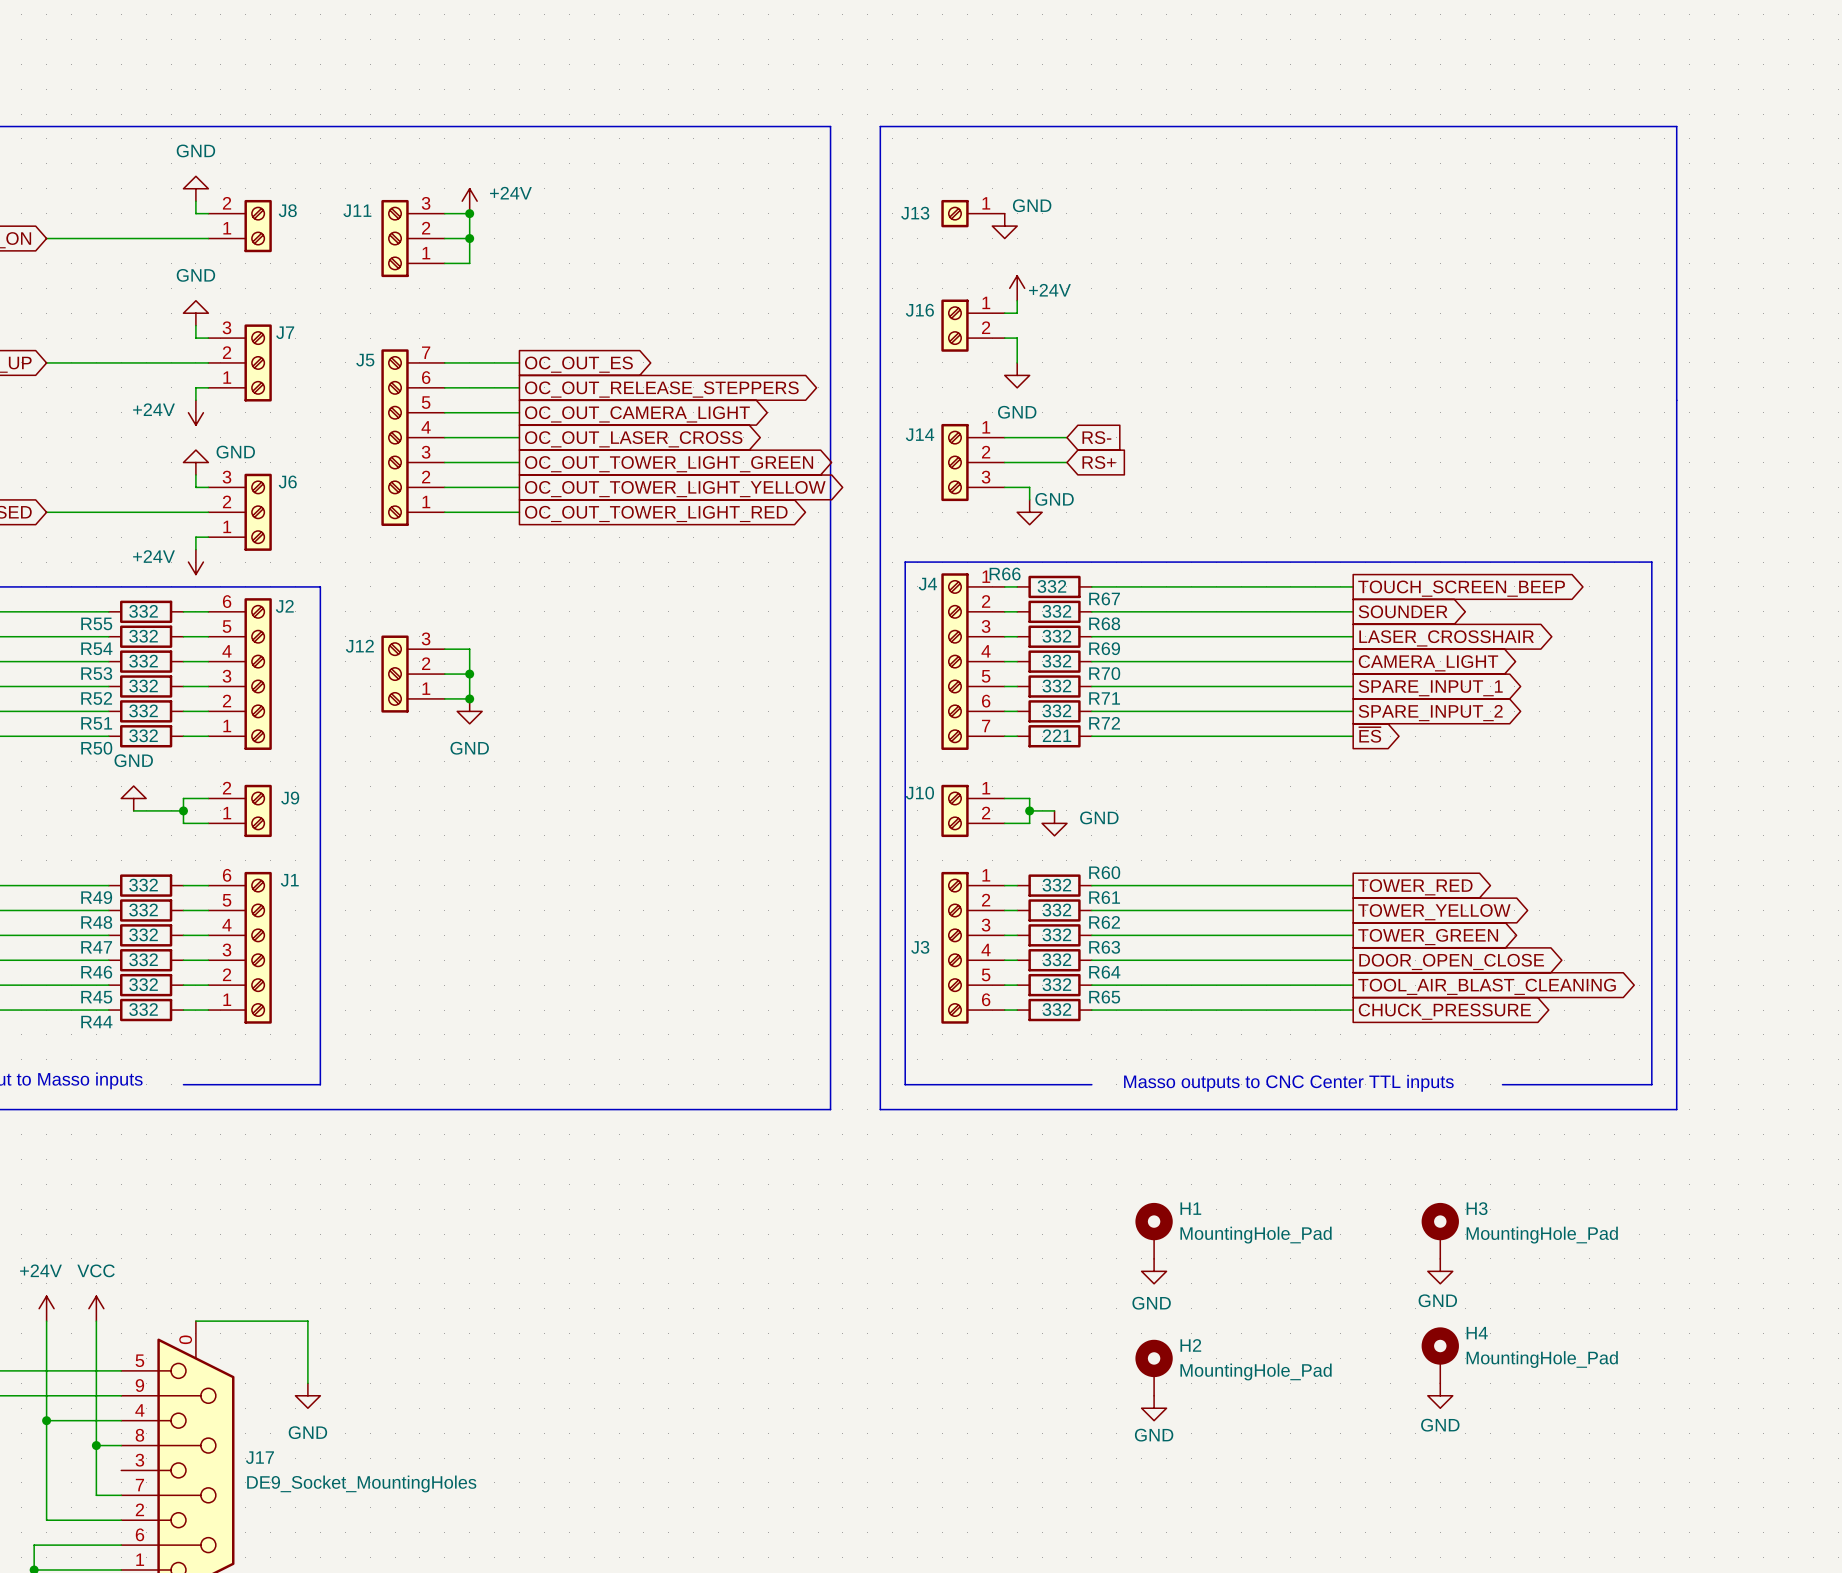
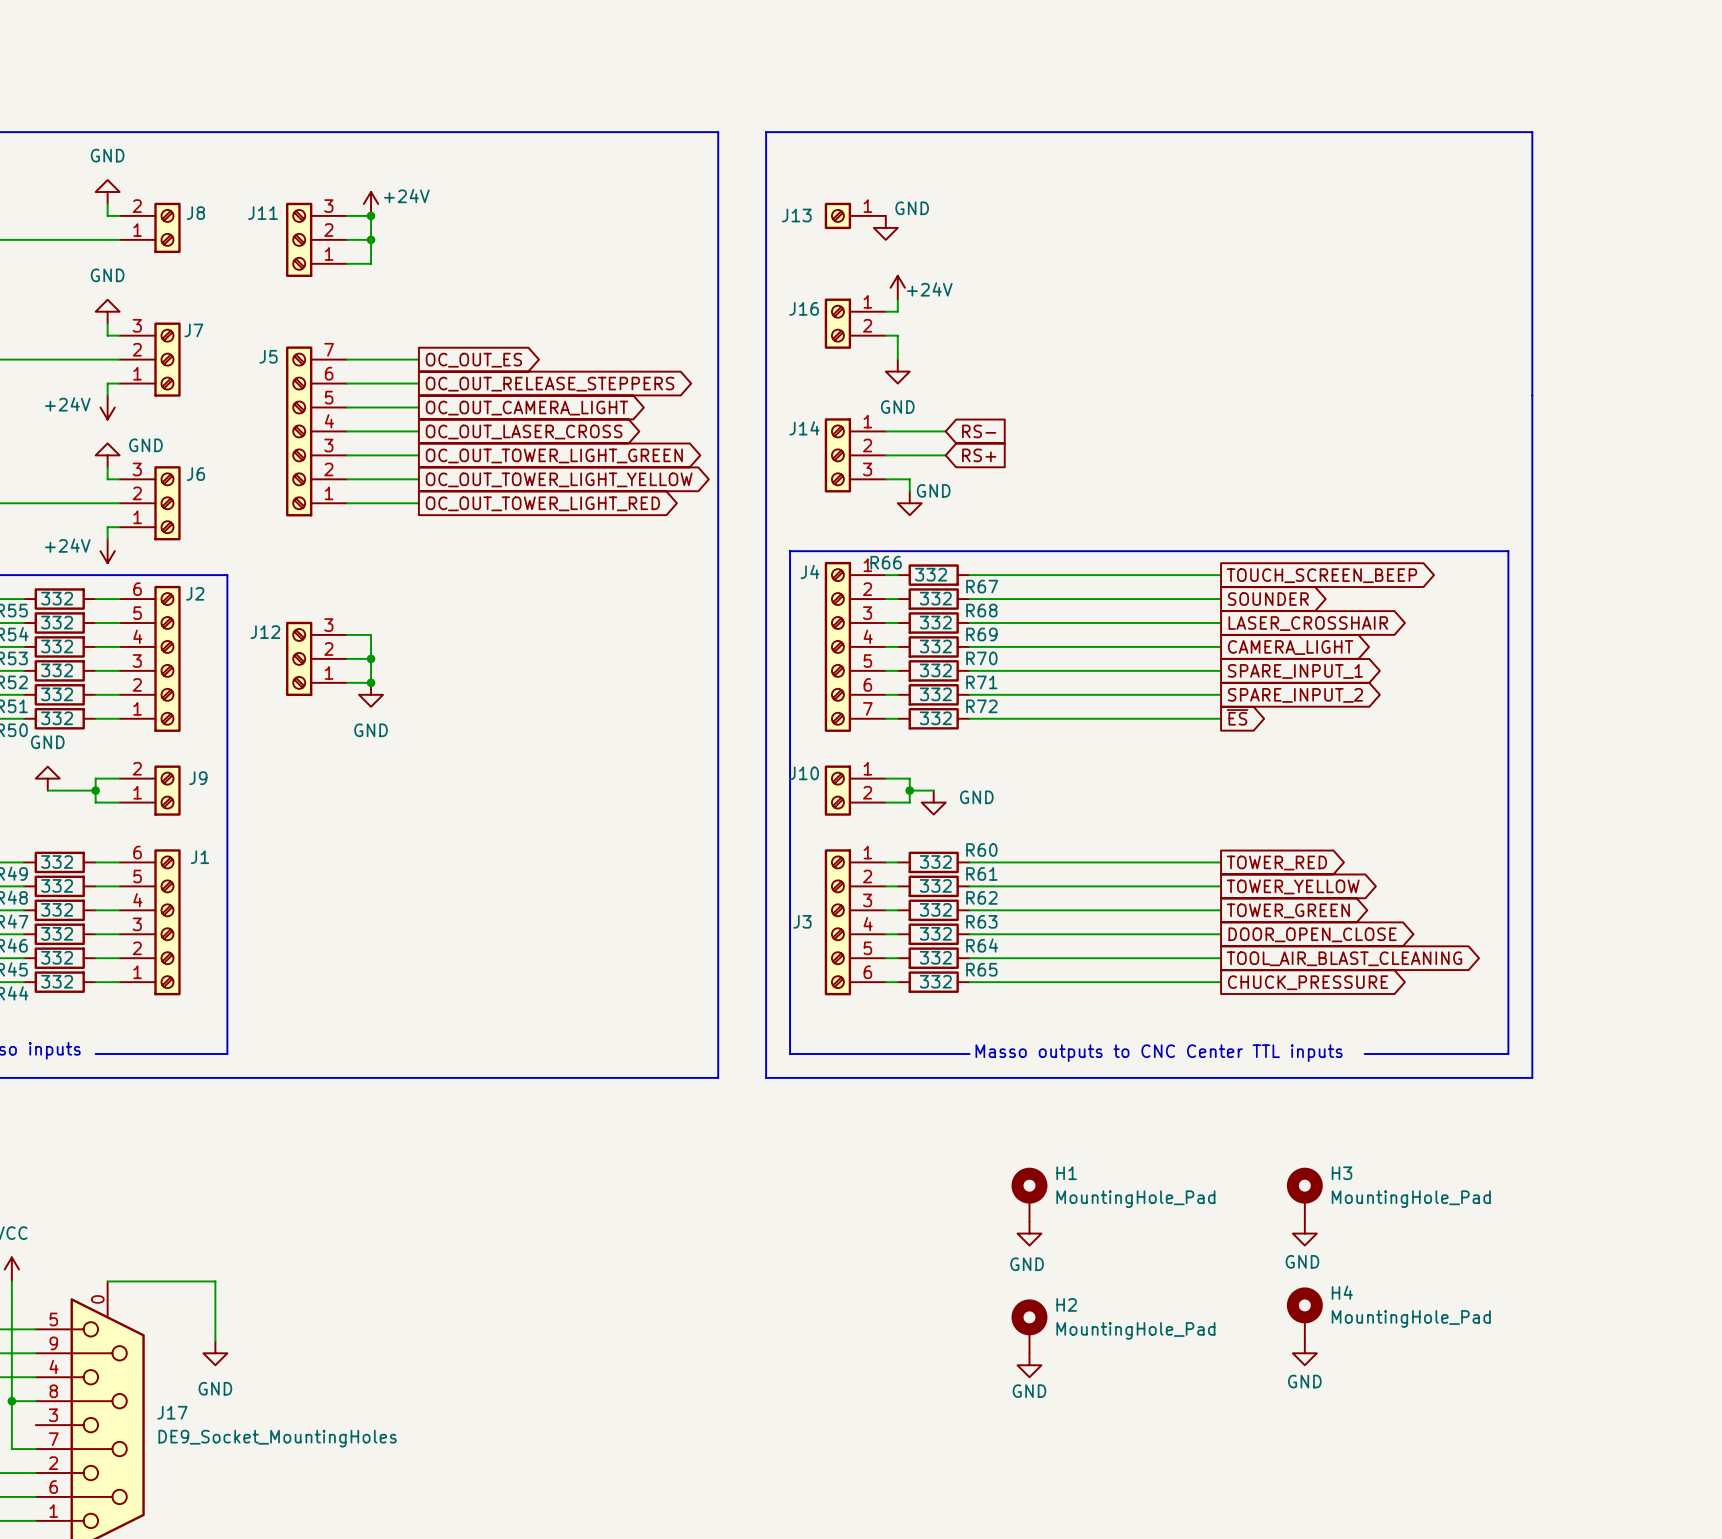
R72 value: 221 (1057, 735) -> 332 (935, 718)

